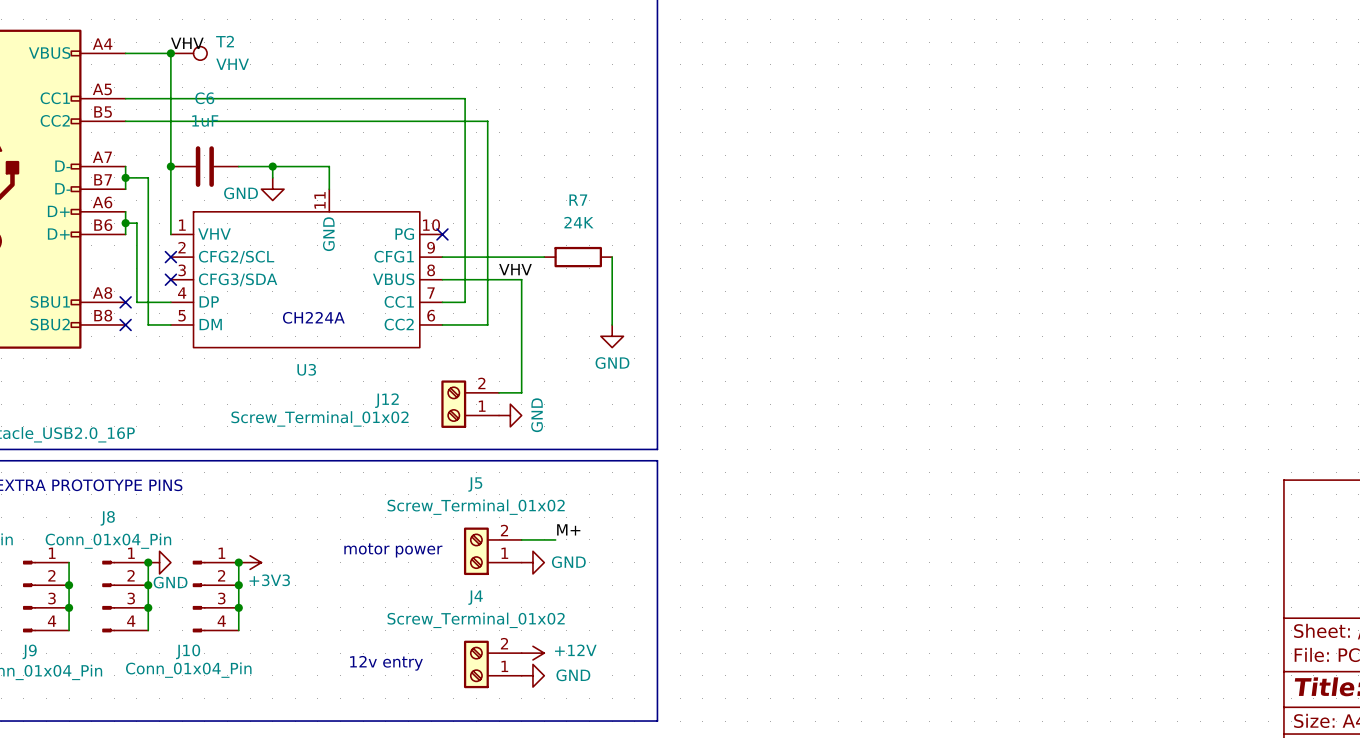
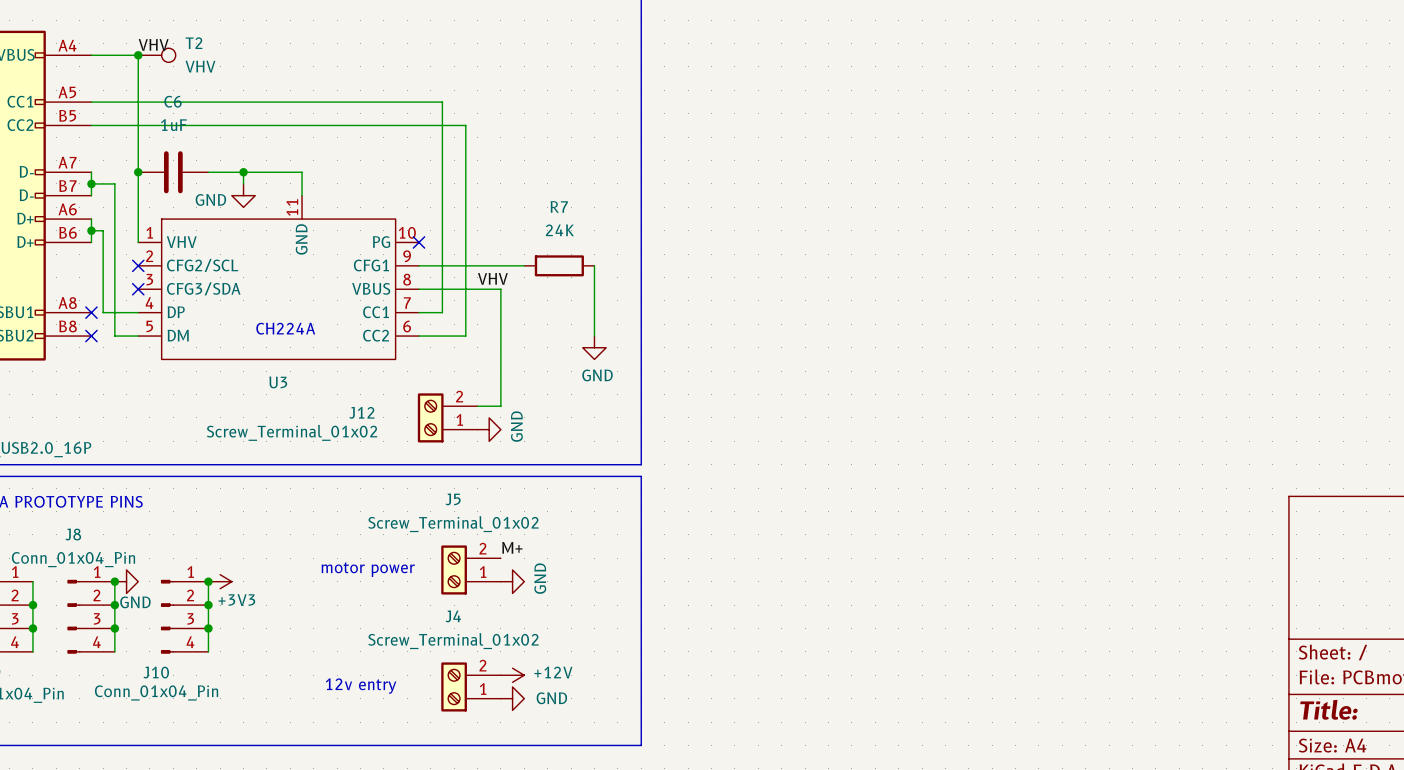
label position: M+ (568, 529) -> M+ (512, 547)
wire: (521, 539) (555, 539) -> none
power symbol text rotation: 0° (568, 562) -> 90° counterclockwise (540, 578)

